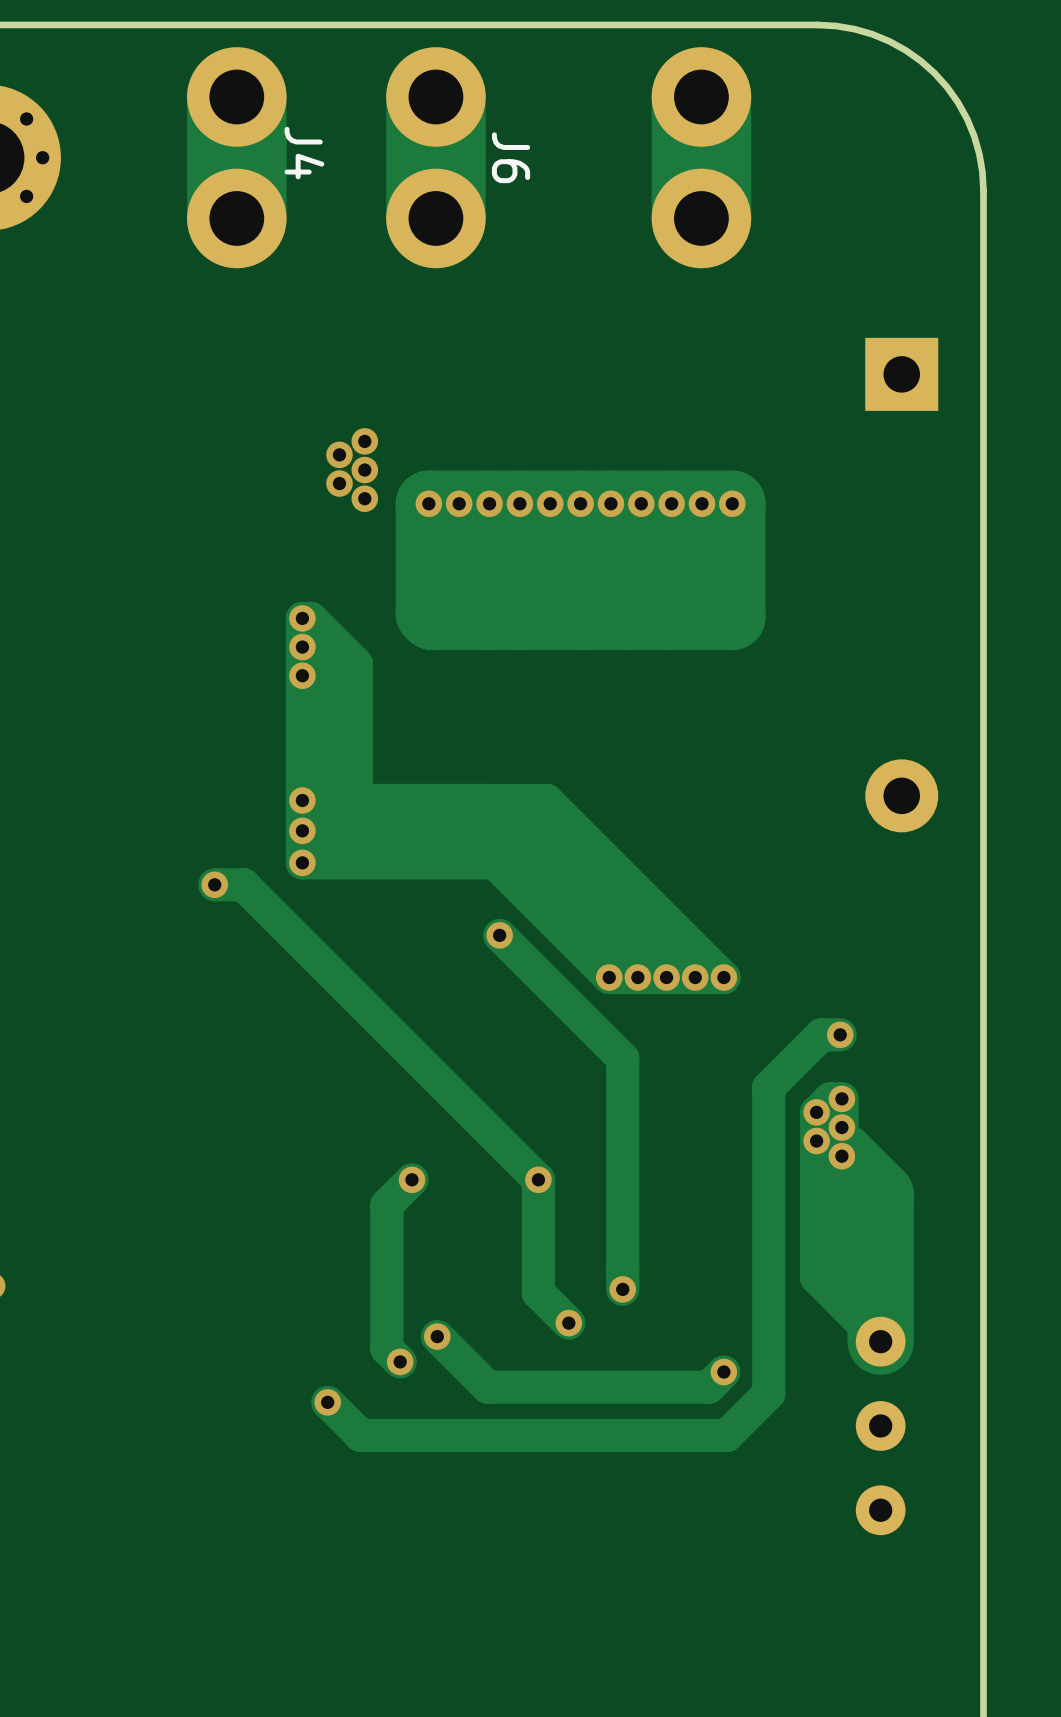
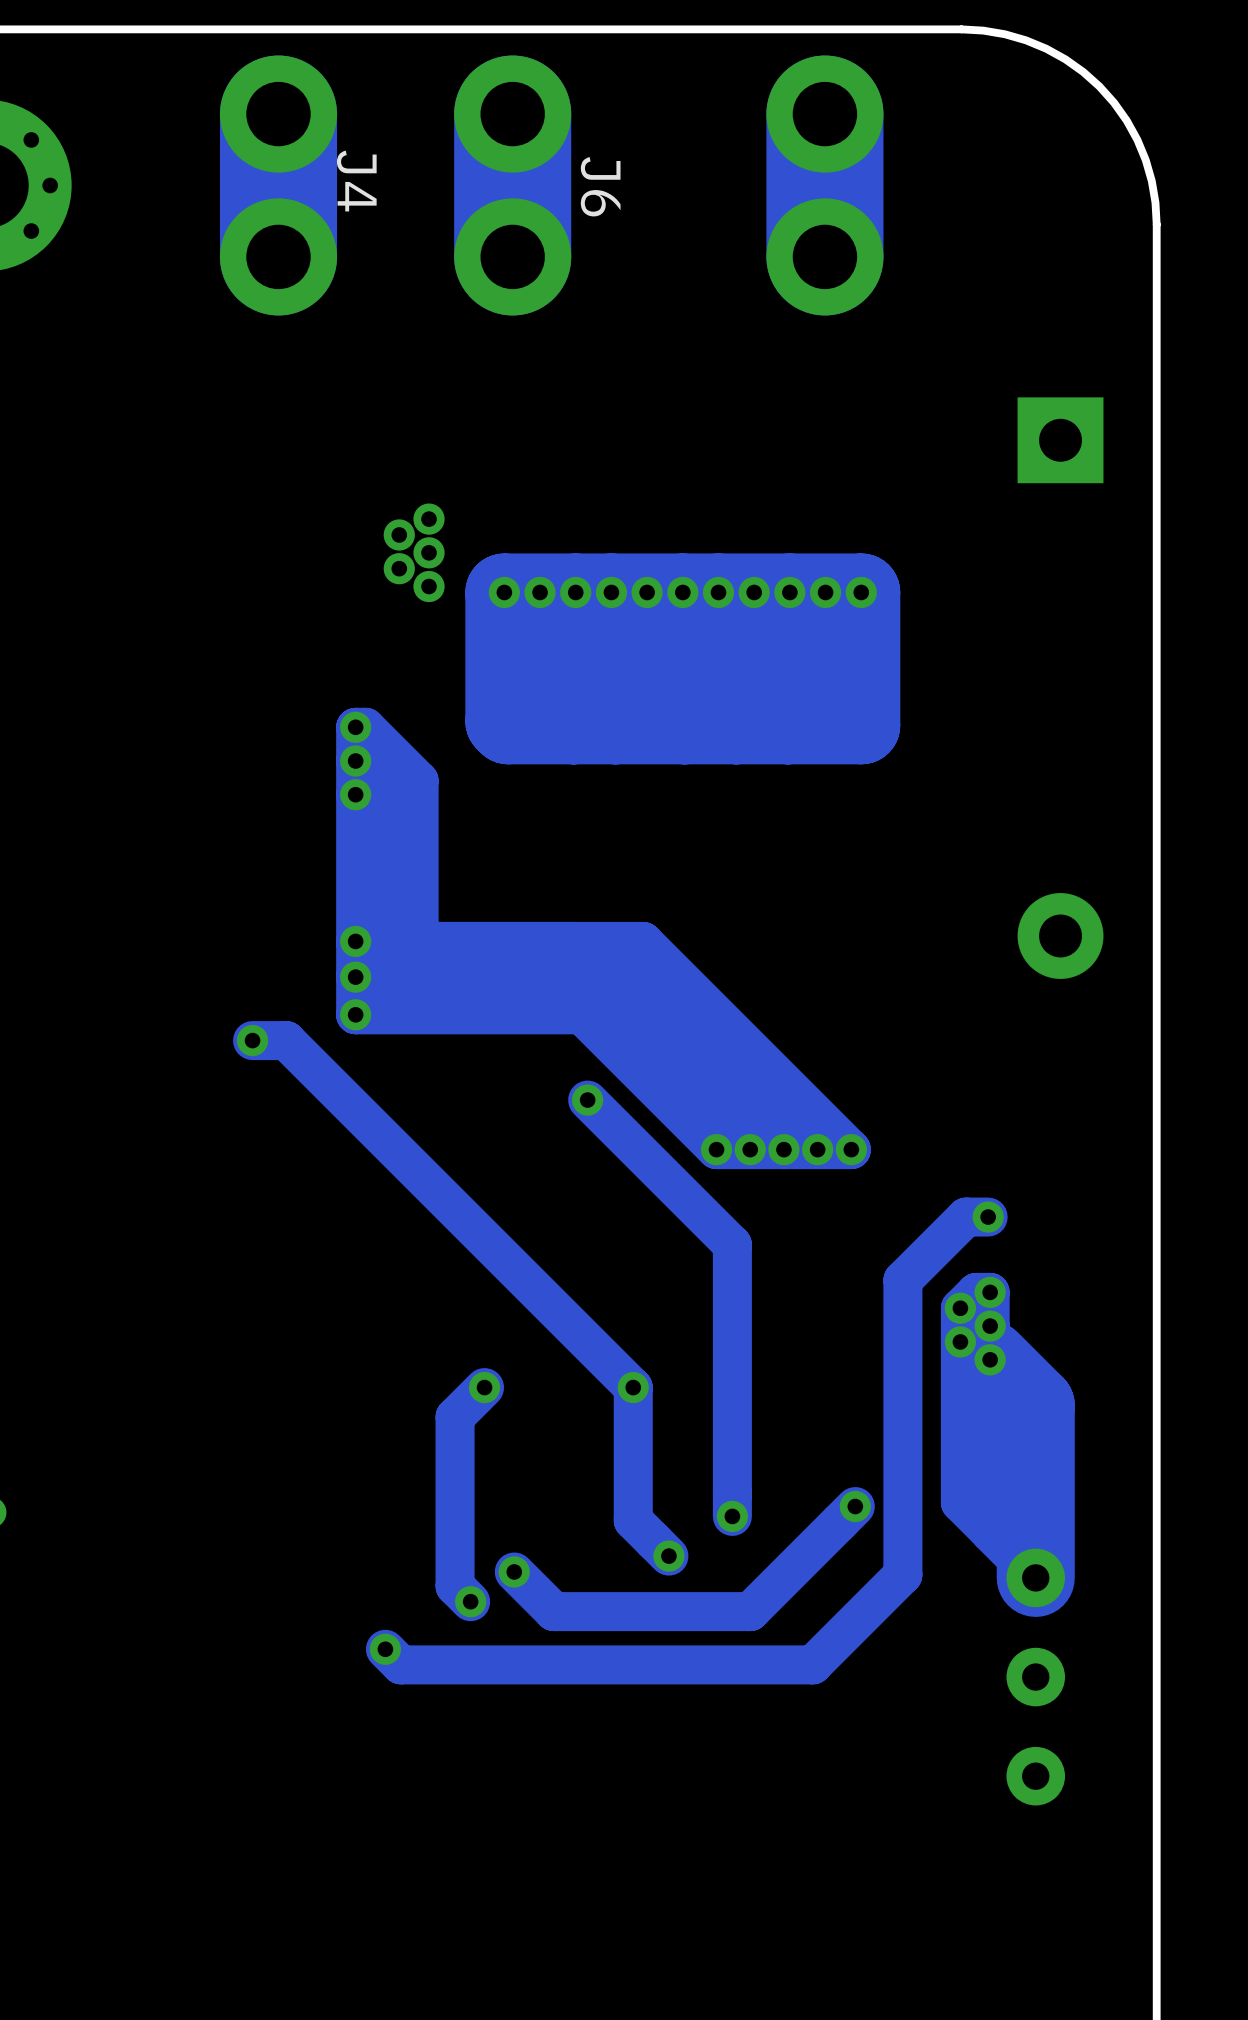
track: (768, 1087) (768, 1393) (726, 1435) (360, 1435) (340, 1415) -> (904, 1278) (902, 1574) (812, 1664) (401, 1664)
track: (471, 1370) (487, 1387) (708, 1387) (723, 1372) -> (553, 1611) (750, 1611) (855, 1506)
via position: (723, 1372) -> (855, 1506)

